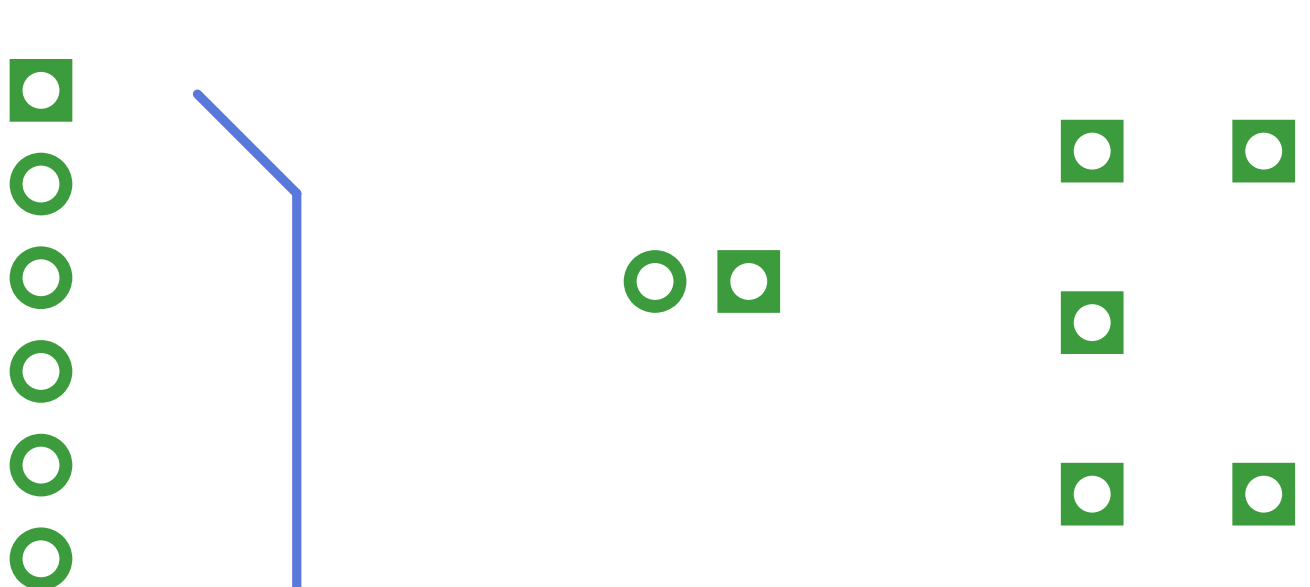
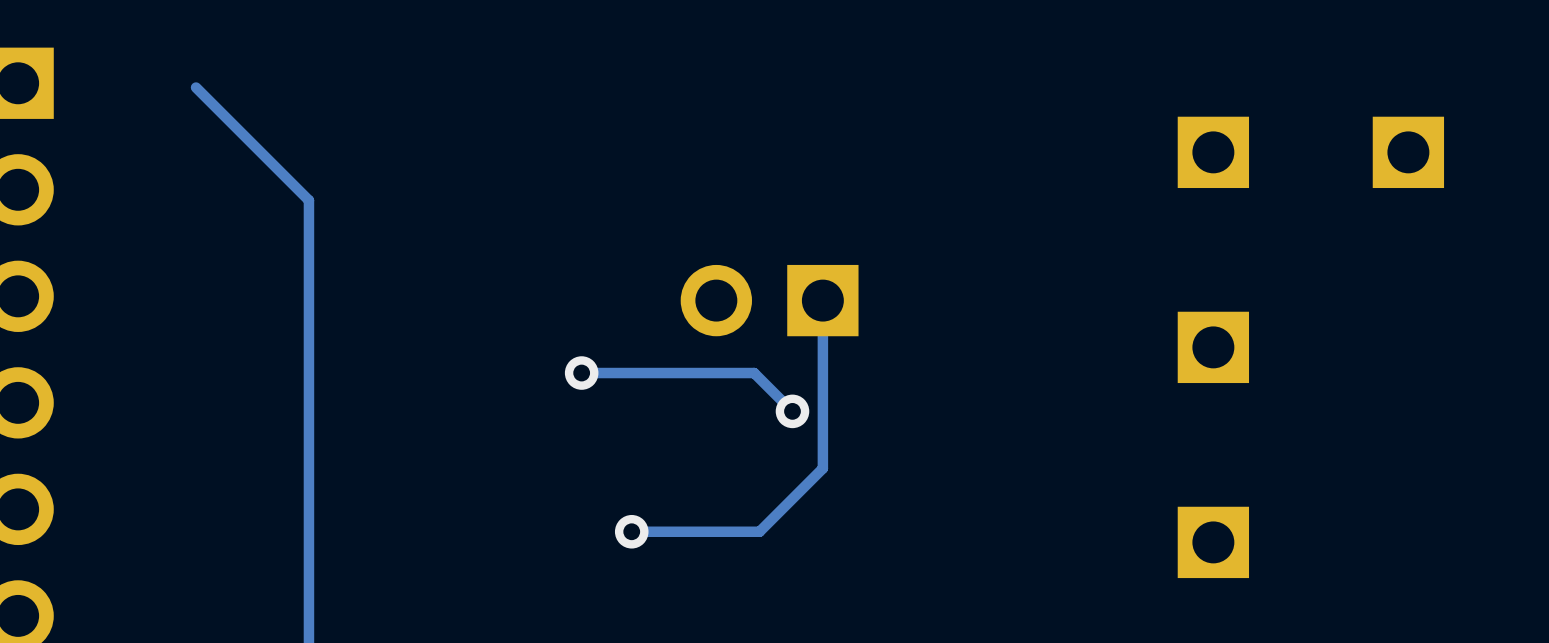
track: none -> (822, 300) (822, 468) (759, 531) (631, 531)
track: none -> (581, 373) (754, 373) (792, 411)
via: none -> (581, 373)
via: none -> (792, 411)
via: none -> (631, 531)
part: (1263, 494) -> none

